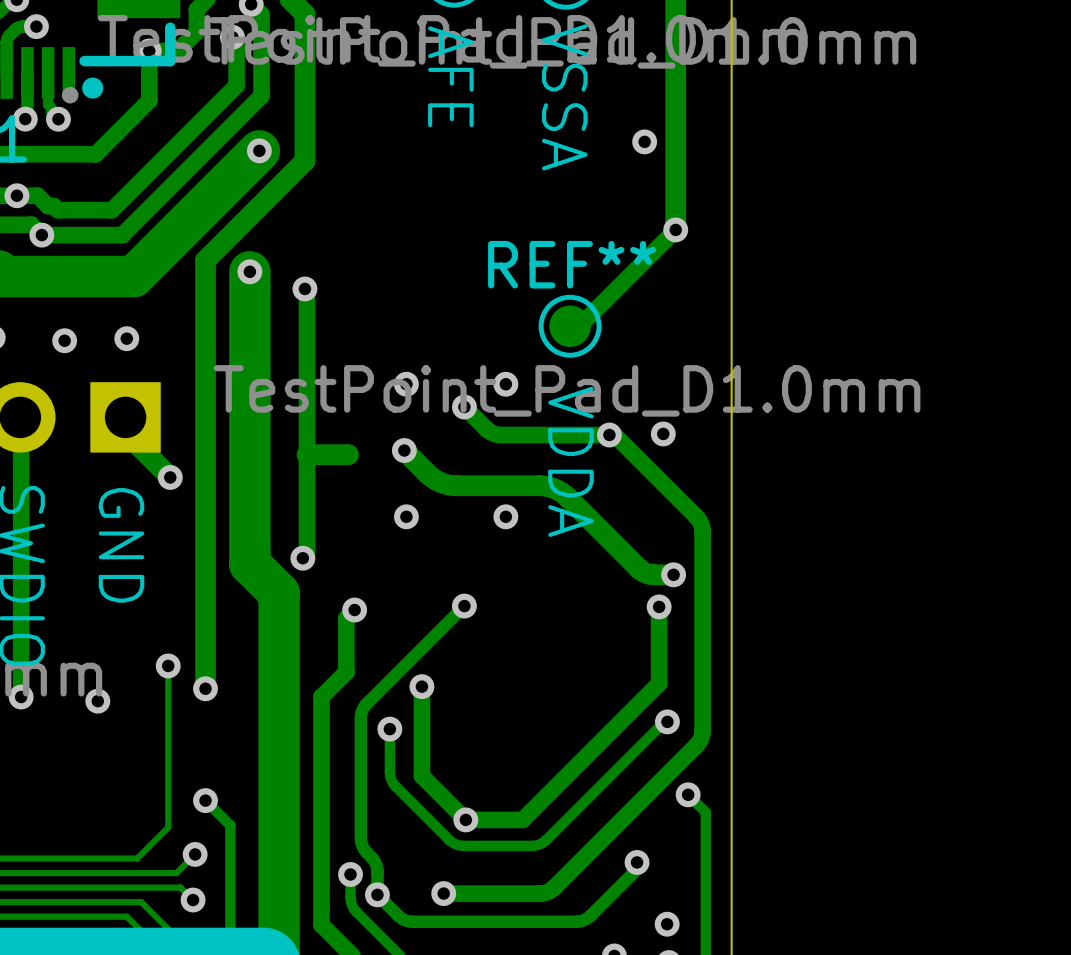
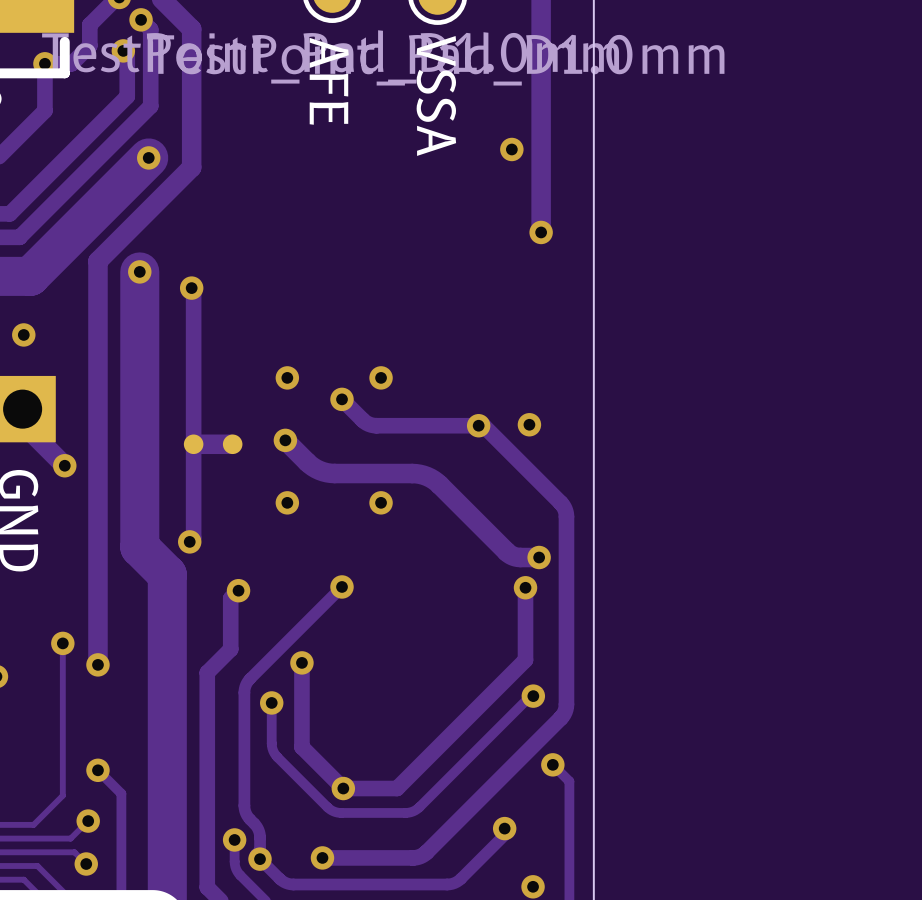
track: (675, 229) (579, 326) (570, 326) -> none
REF**: TestPoint_Pad_D1.0mm (570, 326) -> none
text: VDDA (571, 461) -> none

